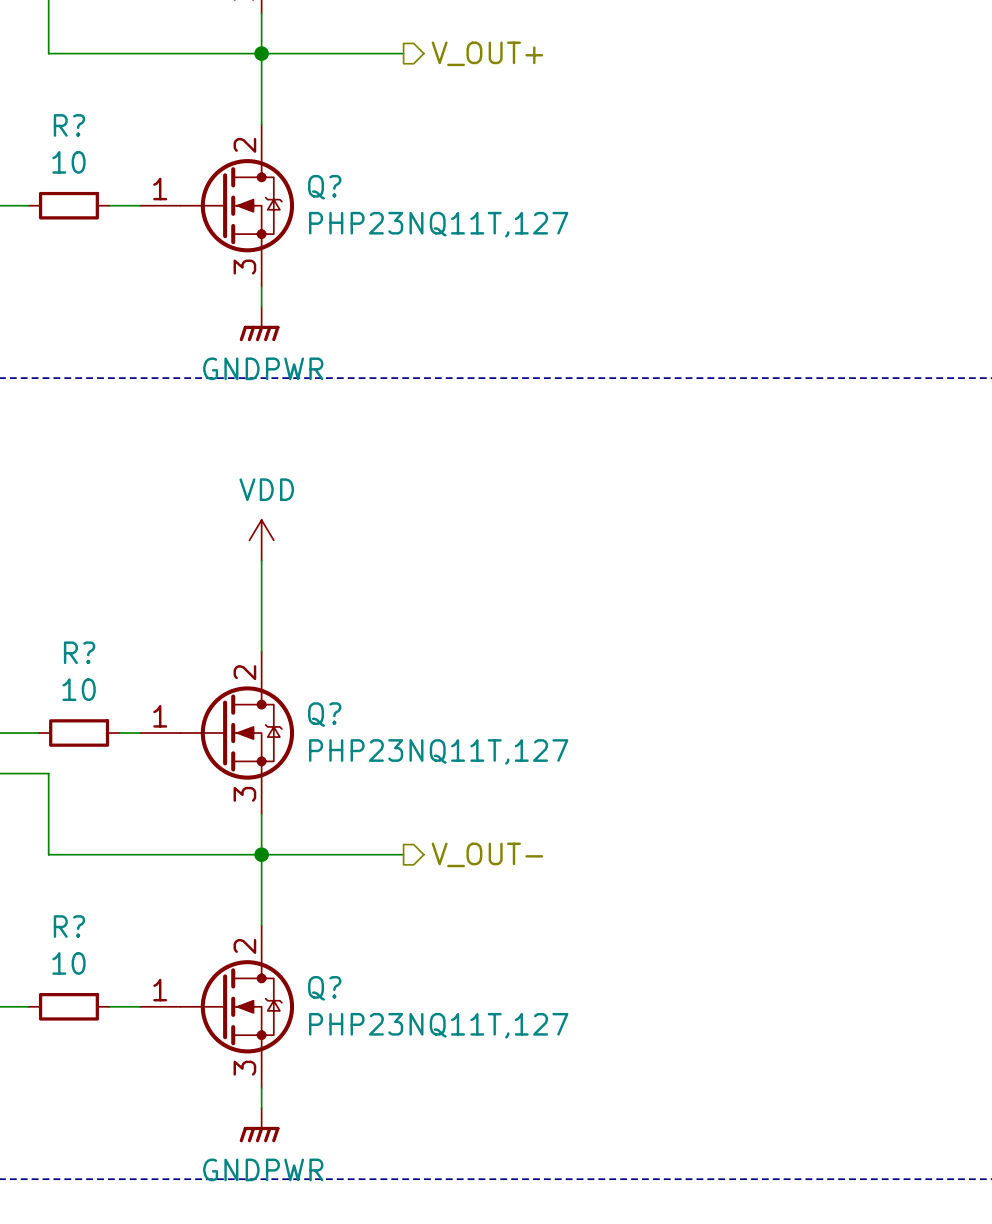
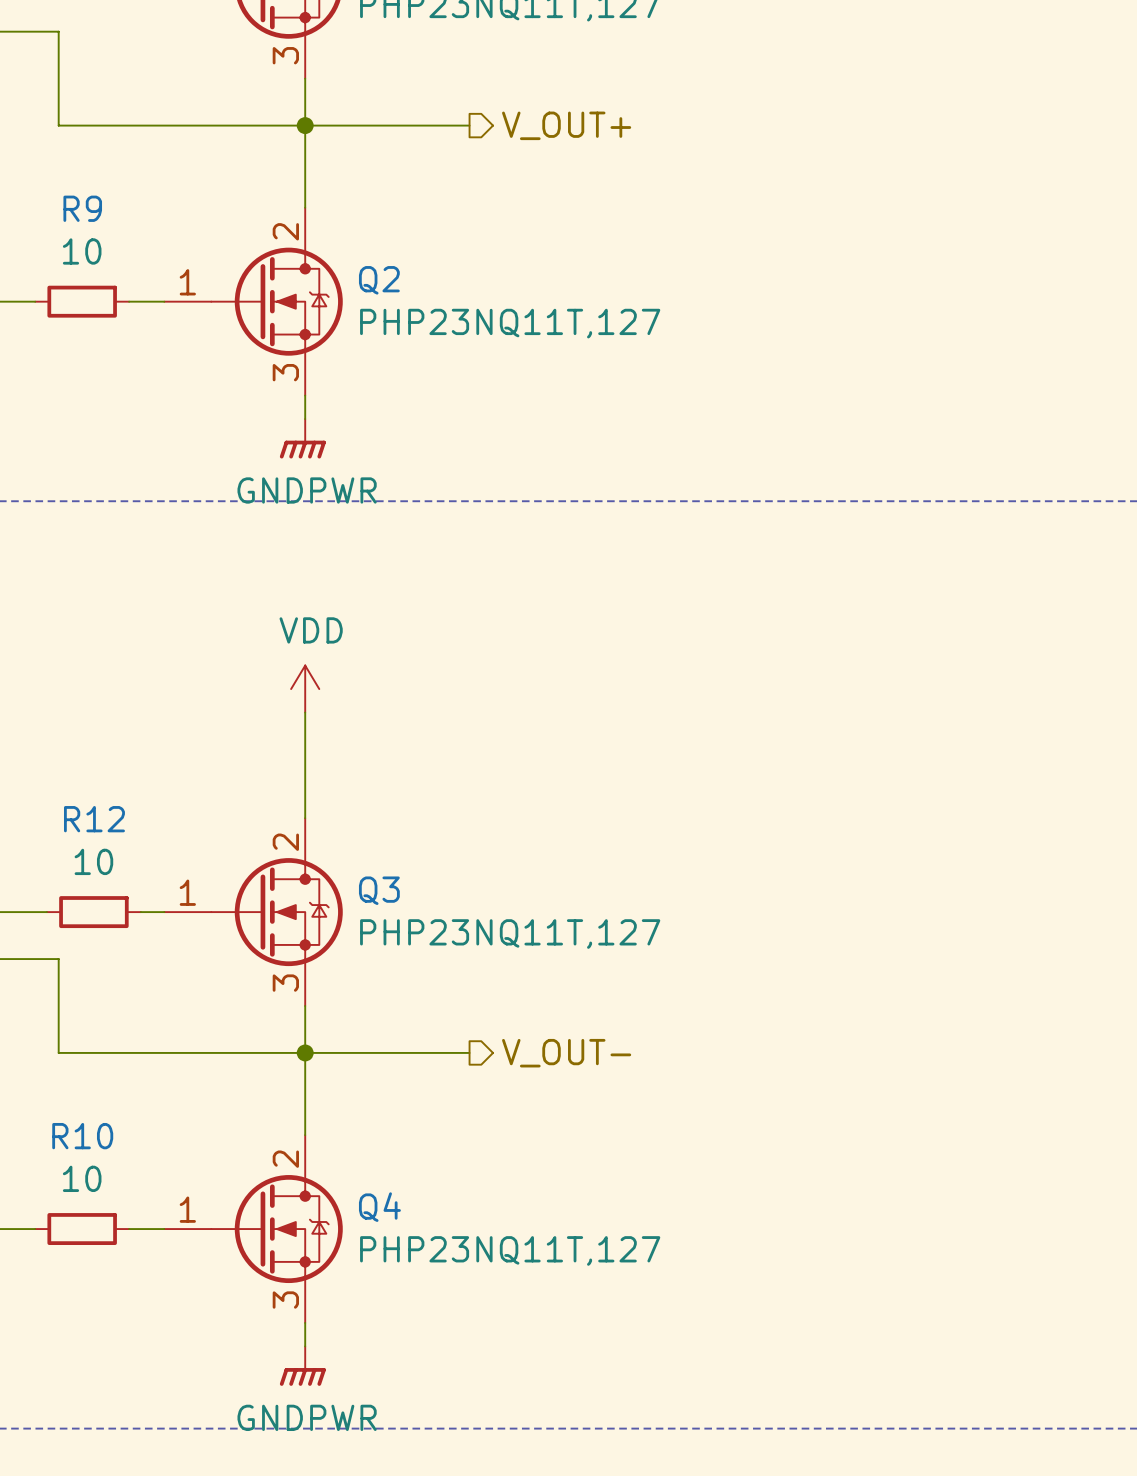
R? name: R? (69, 125) -> R9 (82, 208)
Q? name: Q? (324, 187) -> Q2 (379, 280)
R? name: R? (79, 652) -> R12 (94, 819)
Q? name: Q? (324, 714) -> Q3 (379, 890)
R? name: R? (69, 926) -> R10 (82, 1136)
Q? name: Q? (324, 988) -> Q4 (379, 1207)

